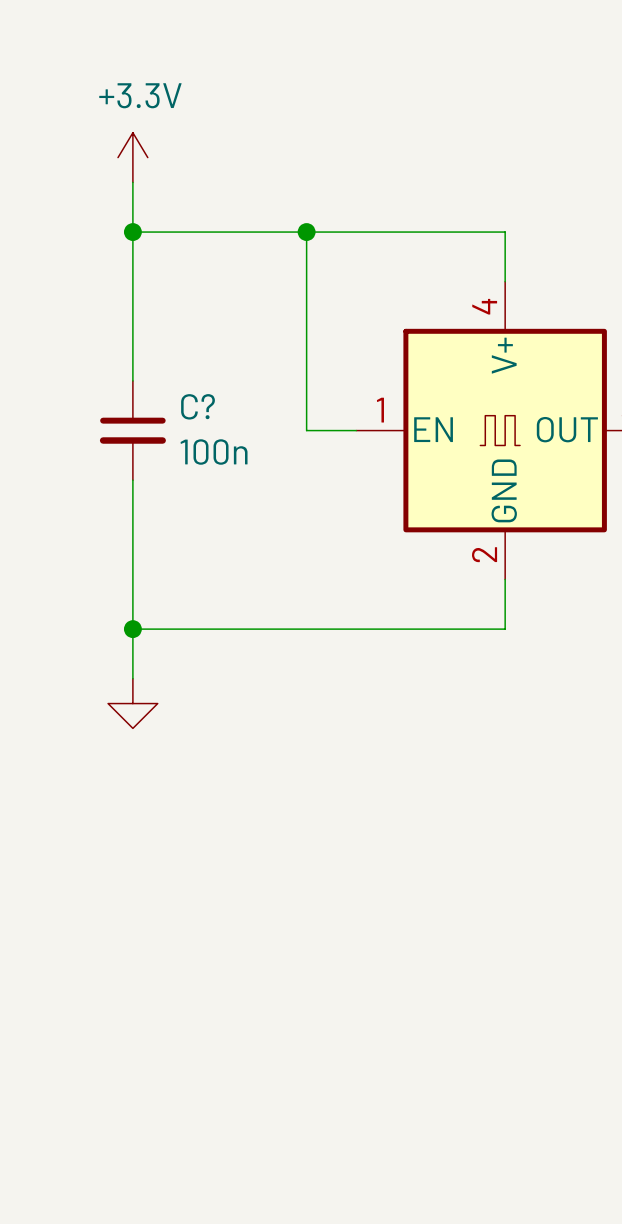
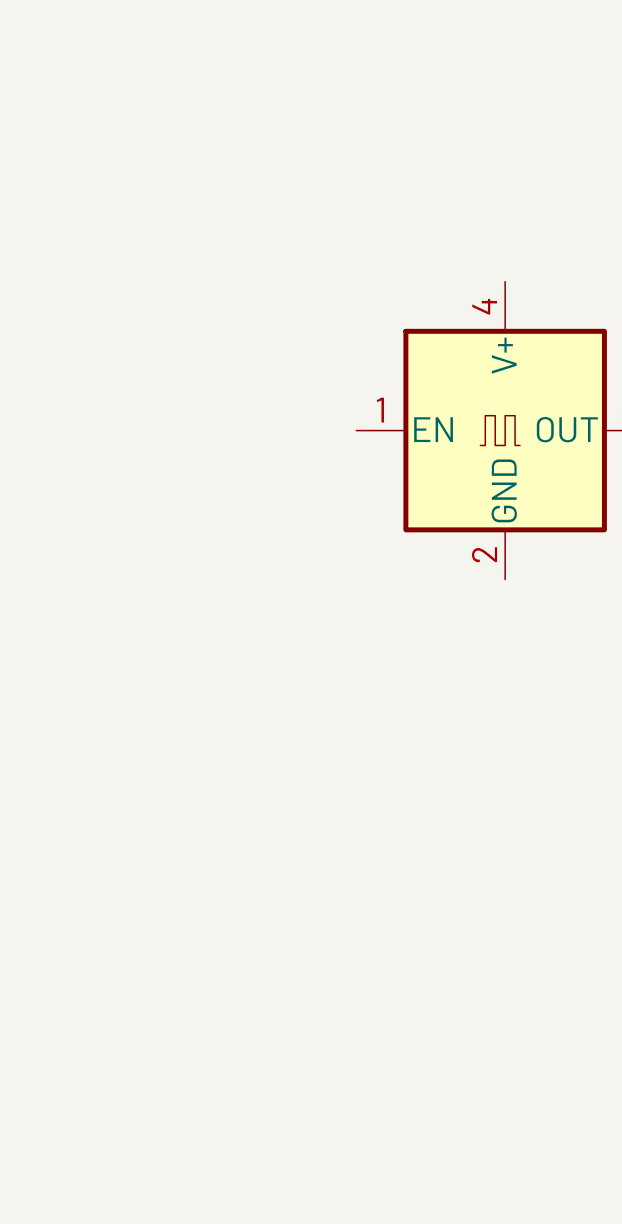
power symbol: +3.3V (132, 157) -> none
wire: (132, 182) (132, 380) -> none
wire: (132, 232) (505, 232) (505, 281) -> none
junction: (132, 232) -> none
wire: (306, 232) (306, 430) (356, 430) -> none
junction: (306, 232) -> none
C?: 100n (132, 430) -> none
wire: (132, 480) (132, 678) -> none
wire: (505, 579) (505, 629) (132, 629) -> none
junction: (132, 629) -> none
power symbol: (132, 703) -> none

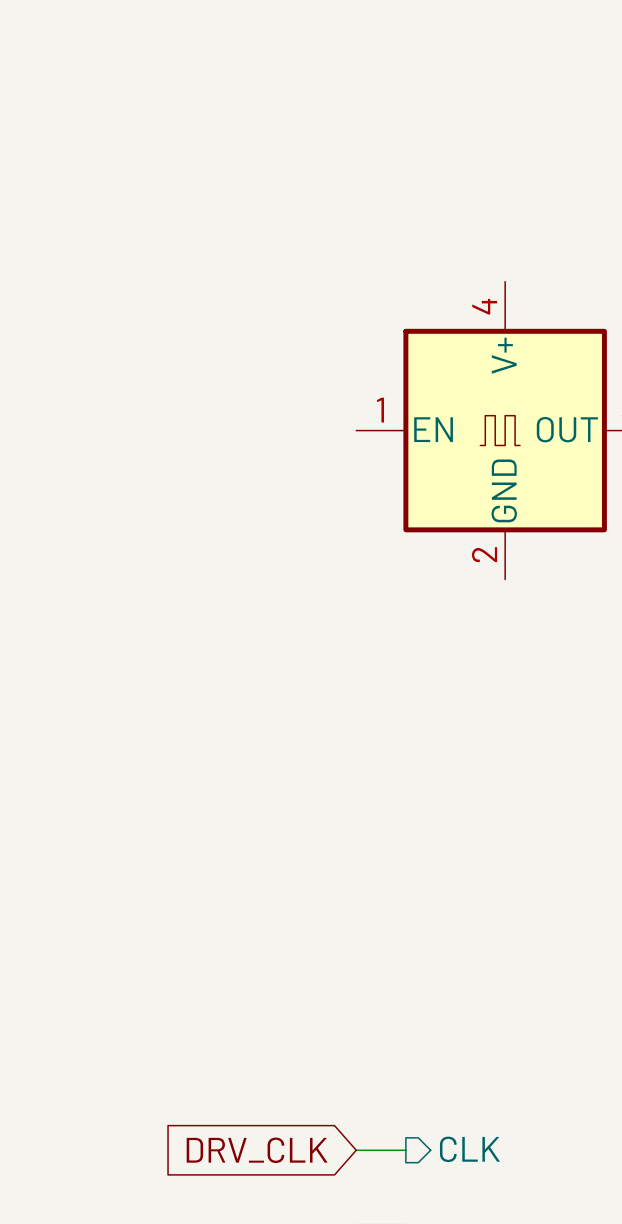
sheet pin: none -> CLK (469, 1149)
global label: none -> DRV_CLK (257, 1150)
wire: none -> (356, 1150) (405, 1150)

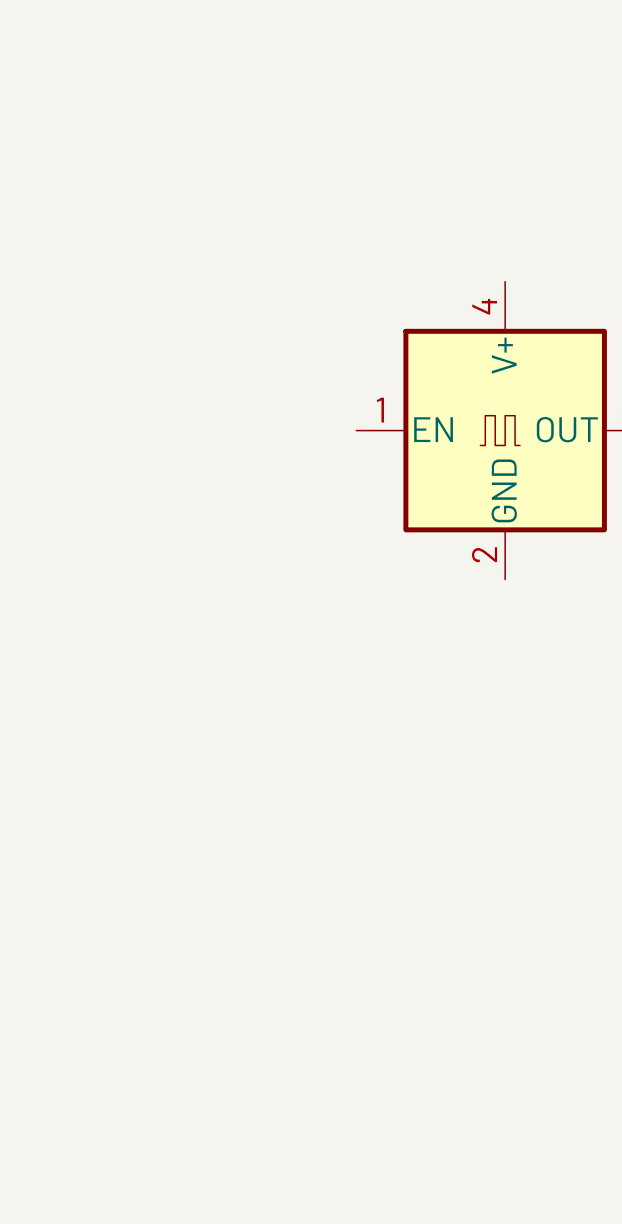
sheet pin: CLK (469, 1149) -> none
global label: DRV_CLK (257, 1150) -> none
wire: (356, 1150) (405, 1150) -> none

